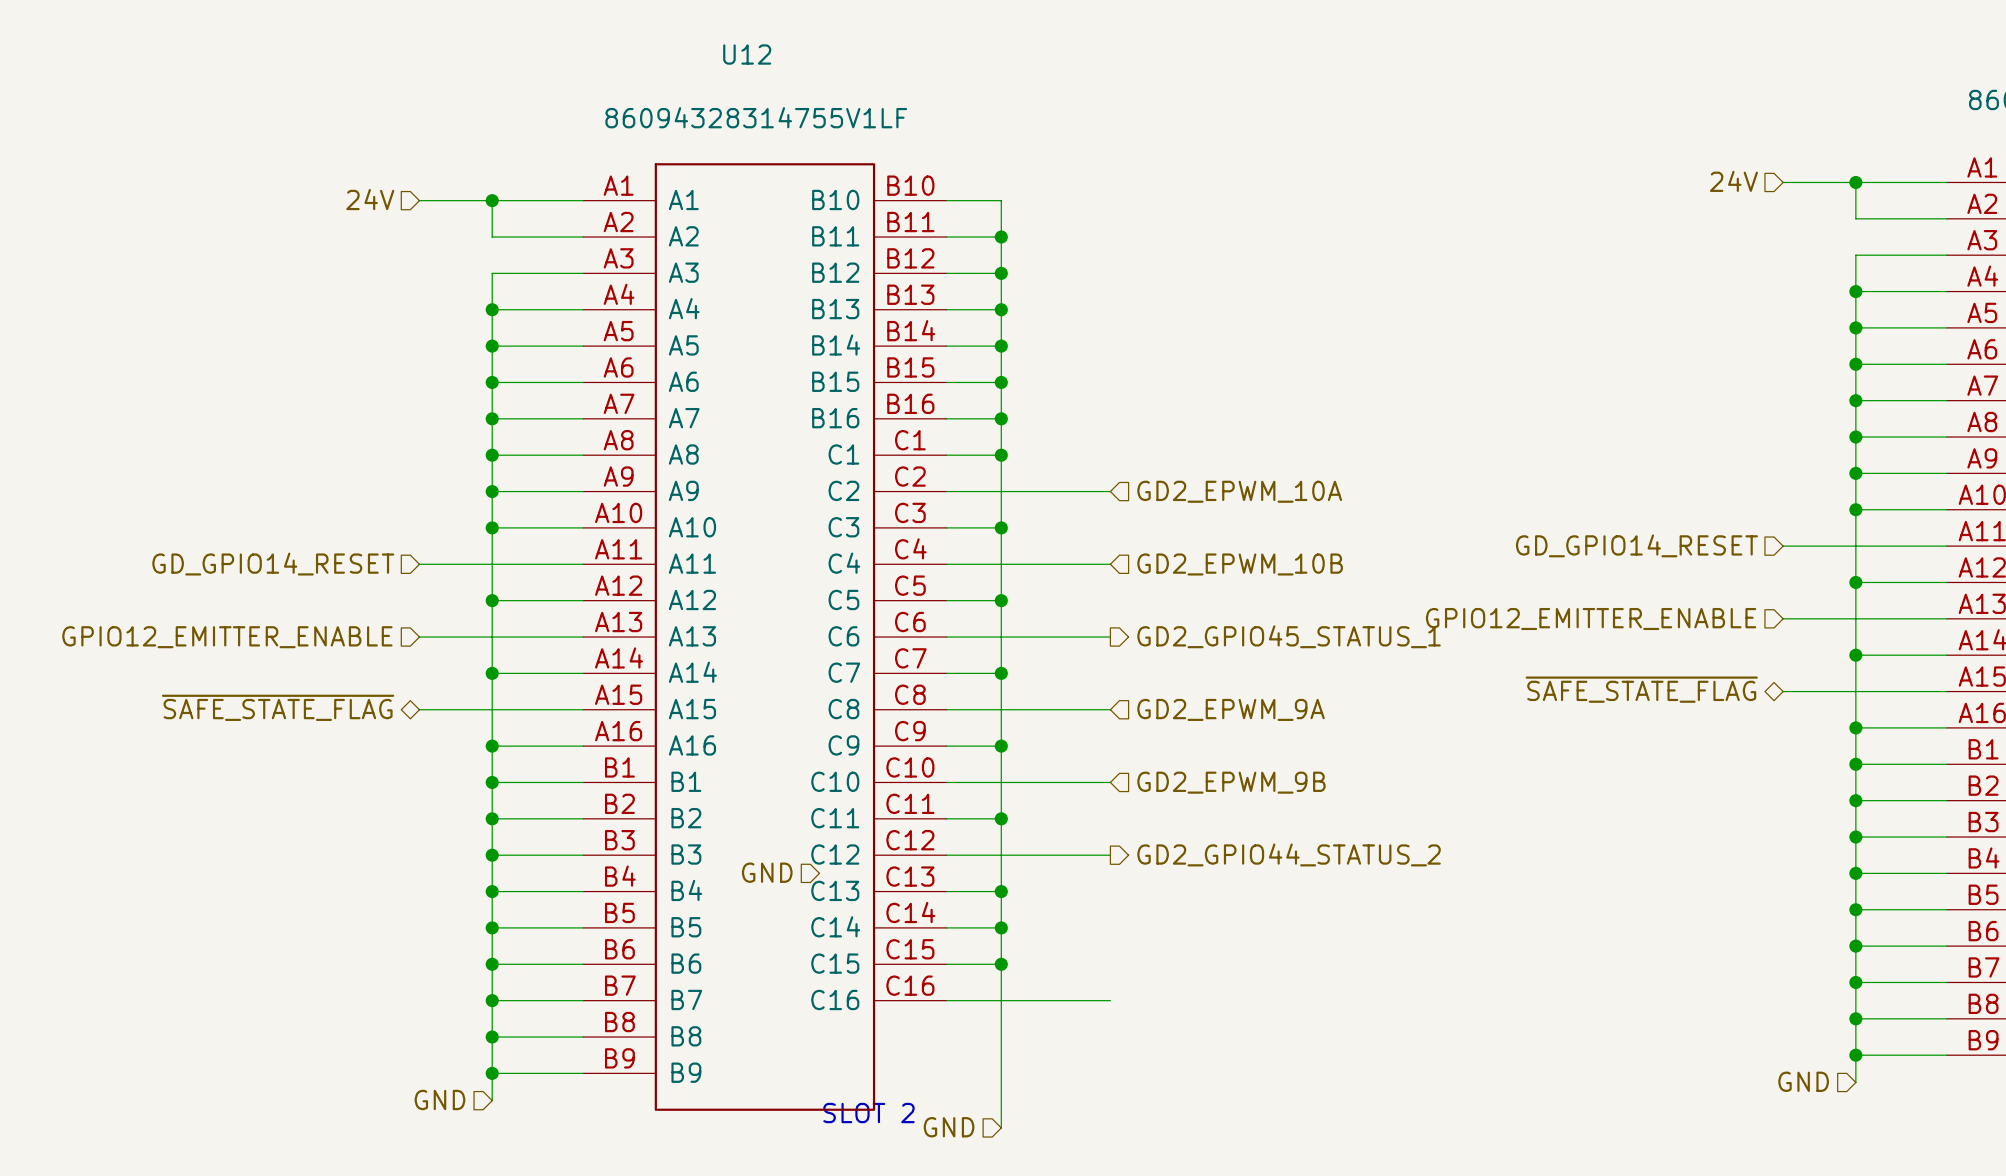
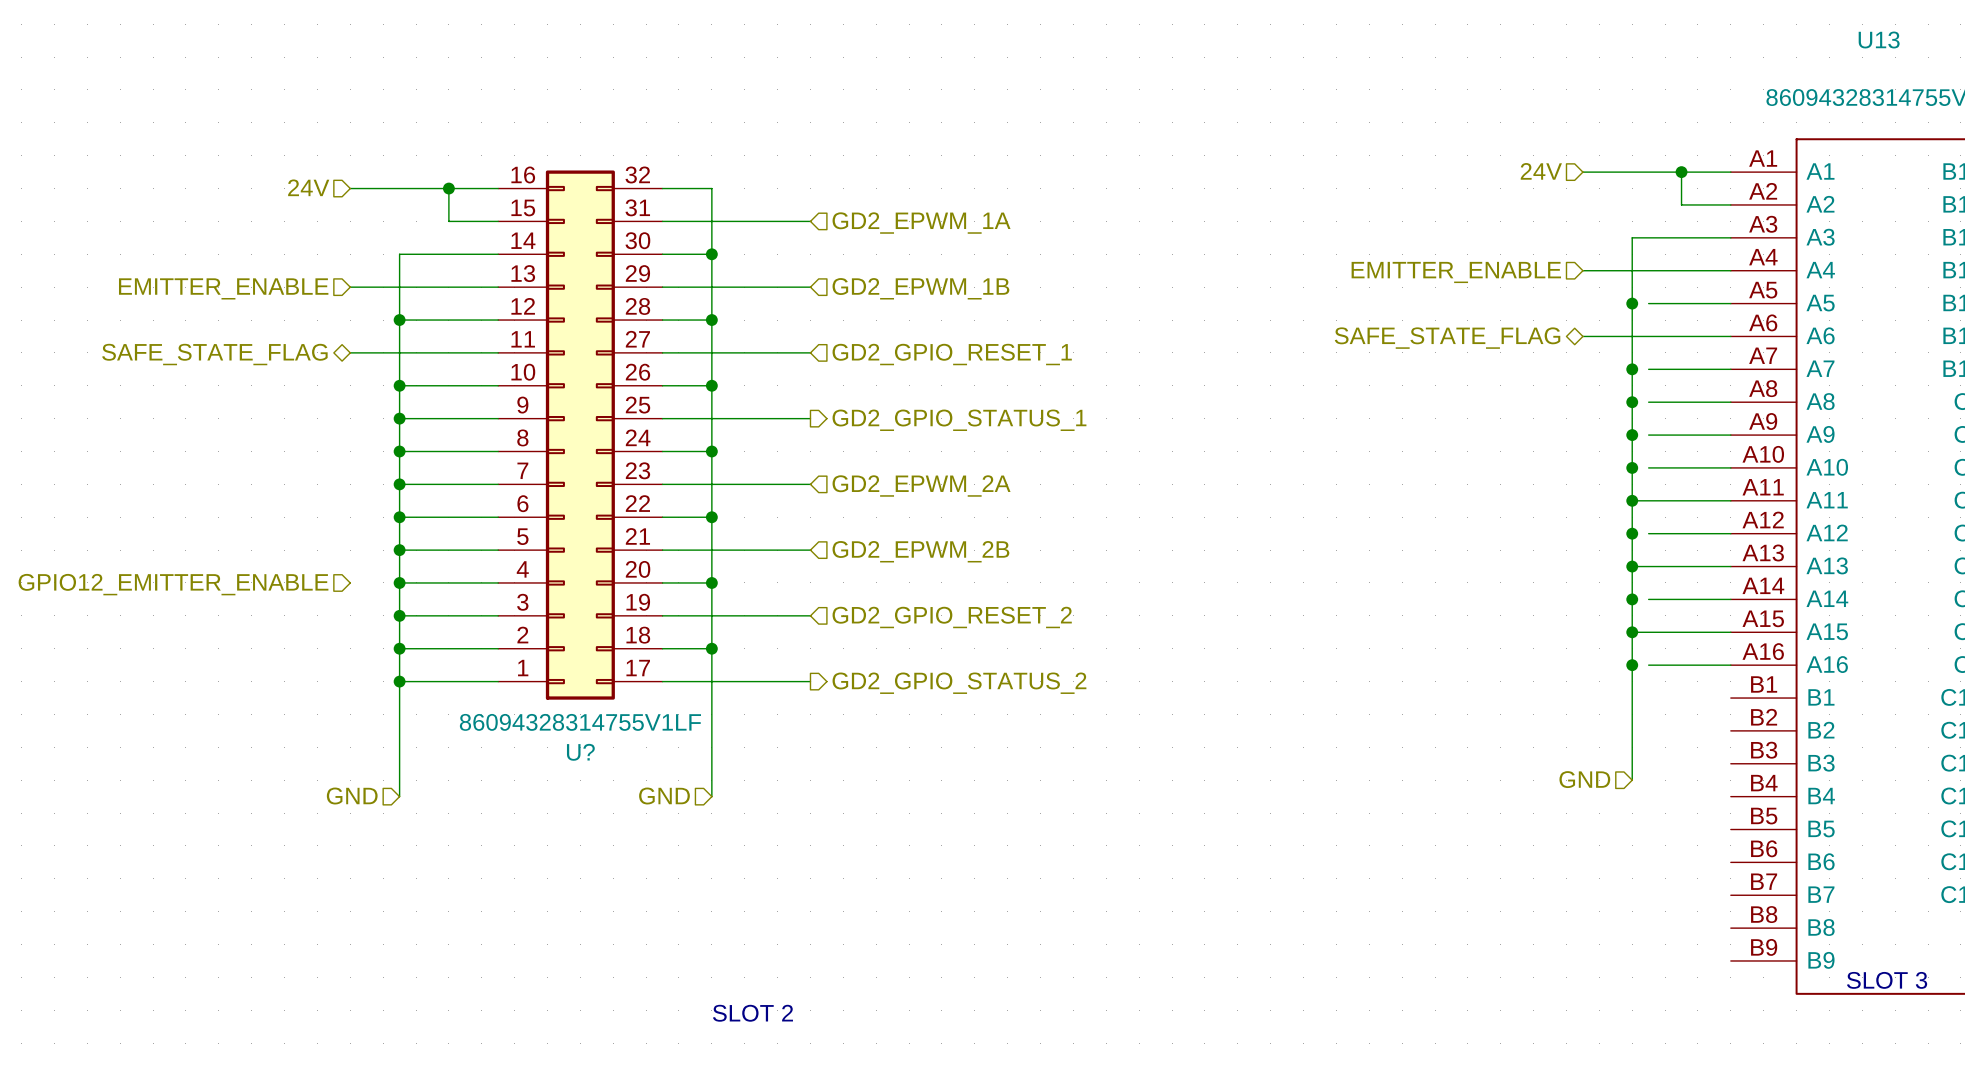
wire: (1855, 182) (1855, 218) (1892, 218) -> (1681, 172) (1681, 204)
junction position: (1855, 182) -> (1681, 172)
wire: (492, 200) (492, 237) (528, 237) -> (448, 188) (448, 221)
junction position: (492, 200) -> (448, 188)
wire: none -> (662, 188) (711, 188) (711, 796)
wire: (946, 200) (1001, 200) (1001, 1127) -> none
wire: (946, 237) (1001, 237) -> none
junction: (1001, 237) -> none
hierarchical label: none -> GD2_EPWM_1A (921, 223)
wire: (1855, 255) (1855, 1082) -> (1648, 237) (1632, 237) (1632, 780)
wire: (492, 273) (492, 1100) -> (416, 254) (399, 254) (399, 796)
junction: none -> (711, 254)
wire: (946, 273) (1001, 273) -> none
junction: (1001, 273) -> none
hierarchical label: none -> EMITTER_ENABLE (1456, 272)
wire: none -> (1582, 270) (1648, 270)
junction: (1855, 291) -> none
hierarchical label: none -> EMITTER_ENABLE (223, 288)
wire: none -> (350, 287) (416, 287)
junction: (492, 309) -> none
wire: (946, 309) (1001, 309) -> none
junction: (1001, 309) -> none
hierarchical label: none -> GD2_EPWM_1B (920, 288)
junction position: (1855, 327) -> (1632, 303)
wire: none -> (399, 320) (416, 320)
junction position: (492, 346) -> (399, 320)
junction: none -> (711, 320)
wire: (946, 346) (1001, 346) -> none
junction: (1001, 346) -> none
hierarchical label: none -> SAFE_STATE_FLAG (1447, 338)
wire: none -> (1582, 336) (1648, 336)
junction: (1855, 364) -> none
hierarchical label: none -> SAFE_STATE_FLAG (214, 354)
wire: none -> (350, 352) (416, 352)
junction: (492, 382) -> none
wire: (946, 382) (1001, 382) -> none
junction: (1001, 382) -> none
hierarchical label: none -> GD2_GPIO_RESET_1 (952, 354)
junction position: (1855, 400) -> (1632, 369)
wire: none -> (399, 385) (416, 385)
junction position: (492, 418) -> (399, 385)
junction: none -> (711, 385)
wire: (946, 418) (1001, 418) -> none
junction: (1001, 418) -> none
junction position: (1855, 437) -> (1632, 402)
wire: none -> (399, 418) (416, 418)
junction position: (492, 455) -> (399, 418)
wire: (946, 455) (1001, 455) -> none
junction: (1001, 455) -> none
hierarchical label: none -> GD2_GPIO_STATUS_1 (959, 420)
U?: none -> 86094328314755V1LF (580, 435)
junction position: (1855, 473) -> (1632, 435)
wire: none -> (399, 451) (416, 451)
junction position: (492, 491) -> (399, 451)
junction: none -> (711, 451)
wire: (946, 491) (1110, 491) -> (662, 221) (810, 221)
hierarchical label: GD2_EPWM_10A (1239, 491) -> none
junction position: (1855, 509) -> (1632, 467)
wire: none -> (399, 484) (416, 484)
junction position: (492, 527) -> (399, 484)
wire: (946, 527) (1001, 527) -> (662, 254) (711, 254)
junction: (1001, 527) -> none
hierarchical label: none -> GD2_EPWM_2A (921, 486)
hierarchical label: GD_GPIO14_RESET (1636, 545) -> none
wire: (1783, 546) (1837, 546) -> none
junction: none -> (1632, 500)
hierarchical label: GD_GPIO14_RESET (273, 564) -> none
wire: (419, 564) (474, 564) -> none
junction: none -> (399, 517)
junction: none -> (711, 517)
wire: (946, 564) (1110, 564) -> (662, 287) (810, 287)
hierarchical label: GD2_EPWM_10B (1240, 564) -> none
junction position: (1855, 582) -> (1632, 533)
wire: none -> (399, 550) (416, 550)
junction position: (492, 600) -> (399, 550)
wire: (946, 600) (1001, 600) -> (662, 320) (711, 320)
junction: (1001, 600) -> none
hierarchical label: none -> GD2_EPWM_2B (920, 551)
wire: (1783, 618) (1837, 618) -> none
junction: none -> (1632, 566)
hierarchical label: GPIO12_EMITTER_ENABLE (1591, 619) -> none
hierarchical label shape: output (1289, 636) -> input (952, 617)
hierarchical label: GD2_GPIO45_STATUS_1 (1289, 636) -> GD2_GPIO_RESET_2 (952, 617)
wire: (419, 637) (474, 637) -> none
junction: none -> (399, 582)
U12: 86094328314755V1LF (764, 637) -> none
junction: none -> (711, 582)
wire: (946, 637) (1110, 637) -> (662, 352) (810, 352)
junction position: (1855, 655) -> (1632, 599)
wire: none -> (399, 615) (416, 615)
junction position: (492, 673) -> (399, 615)
wire: none -> (662, 615) (810, 615)
wire: (946, 673) (1001, 673) -> (662, 385) (711, 385)
junction: (1001, 673) -> none
hierarchical label: ~{SAFE_STATE_FLAG} (1641, 689) -> none
wire: (1783, 691) (1837, 691) -> none
junction: none -> (1632, 632)
hierarchical label: ~{SAFE_STATE_FLAG} (278, 707) -> none
wire: (419, 709) (474, 709) -> none
junction: none -> (399, 648)
junction: none -> (711, 648)
wire: (946, 709) (1110, 709) -> (662, 418) (810, 418)
hierarchical label: GD2_EPWM_9A (1231, 709) -> none
junction position: (1855, 727) -> (1632, 665)
wire: none -> (399, 681) (416, 681)
junction position: (492, 746) -> (399, 681)
wire: (946, 746) (1001, 746) -> (662, 451) (711, 451)
junction: (1001, 746) -> none
hierarchical label: none -> GD2_GPIO_STATUS_2 (959, 683)
wire: (1855, 764) (1946, 764) -> none
junction: (1855, 764) -> none
wire: (492, 782) (583, 782) -> none
junction: (492, 782) -> none
wire: (946, 782) (1110, 782) -> (662, 484) (810, 484)
hierarchical label: GD2_EPWM_9B (1231, 782) -> none
wire: (1855, 800) (1946, 800) -> none
junction: (1855, 800) -> none
wire: (492, 818) (583, 818) -> none
junction: (492, 818) -> none
wire: (946, 818) (1001, 818) -> (662, 517) (711, 517)
junction: (1001, 818) -> none
wire: (1855, 837) (1946, 837) -> none
junction: (1855, 837) -> none
hierarchical label: GD2_GPIO44_STATUS_2 (1289, 854) -> none
wire: (492, 855) (583, 855) -> none
junction: (492, 855) -> none
wire: (946, 855) (1110, 855) -> (662, 550) (810, 550)
wire: (1855, 873) (1946, 873) -> none
junction: (1855, 873) -> none
wire: (492, 891) (583, 891) -> none
junction: (492, 891) -> none
wire: (946, 891) (1001, 891) -> (662, 582) (711, 582)
junction: (1001, 891) -> none
wire: (1855, 909) (1946, 909) -> none
junction: (1855, 909) -> none
wire: (492, 927) (583, 927) -> none
junction: (492, 927) -> none
wire: (946, 927) (1001, 927) -> none
junction: (1001, 927) -> none
wire: (1855, 946) (1946, 946) -> none
junction: (1855, 946) -> none
wire: (492, 964) (583, 964) -> none
junction: (492, 964) -> none
wire: (946, 964) (1001, 964) -> (662, 648) (711, 648)
junction: (1001, 964) -> none
wire: (1855, 982) (1946, 982) -> none
junction: (1855, 982) -> none
wire: (492, 1000) (583, 1000) -> none
junction: (492, 1000) -> none
wire: (946, 1000) (1110, 1000) -> (662, 681) (810, 681)
wire: (1855, 1018) (1946, 1018) -> none
junction: (1855, 1018) -> none
wire: (492, 1037) (583, 1037) -> none
junction: (492, 1037) -> none
wire: (1855, 1055) (1946, 1055) -> none
junction: (1855, 1055) -> none
wire: (492, 1073) (583, 1073) -> none
junction: (492, 1073) -> none
hierarchical label position: GND (1803, 1081) -> GND (1584, 779)
hierarchical label position: GND (439, 1099) -> GND (352, 796)
hierarchical label: GND (949, 1127) -> none

